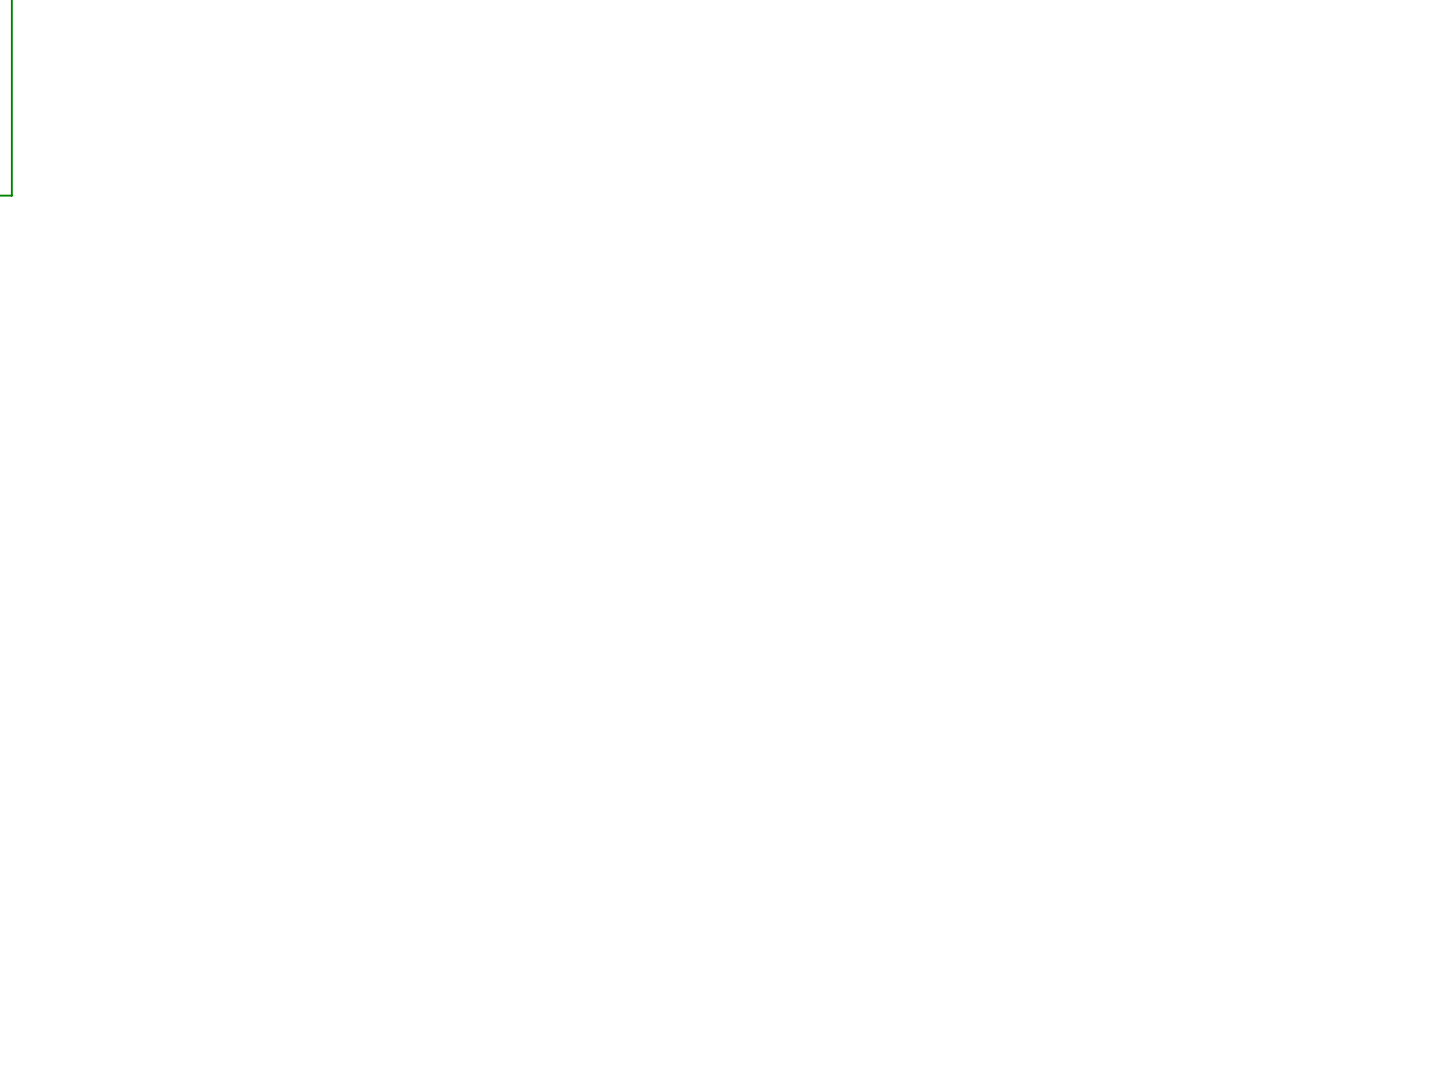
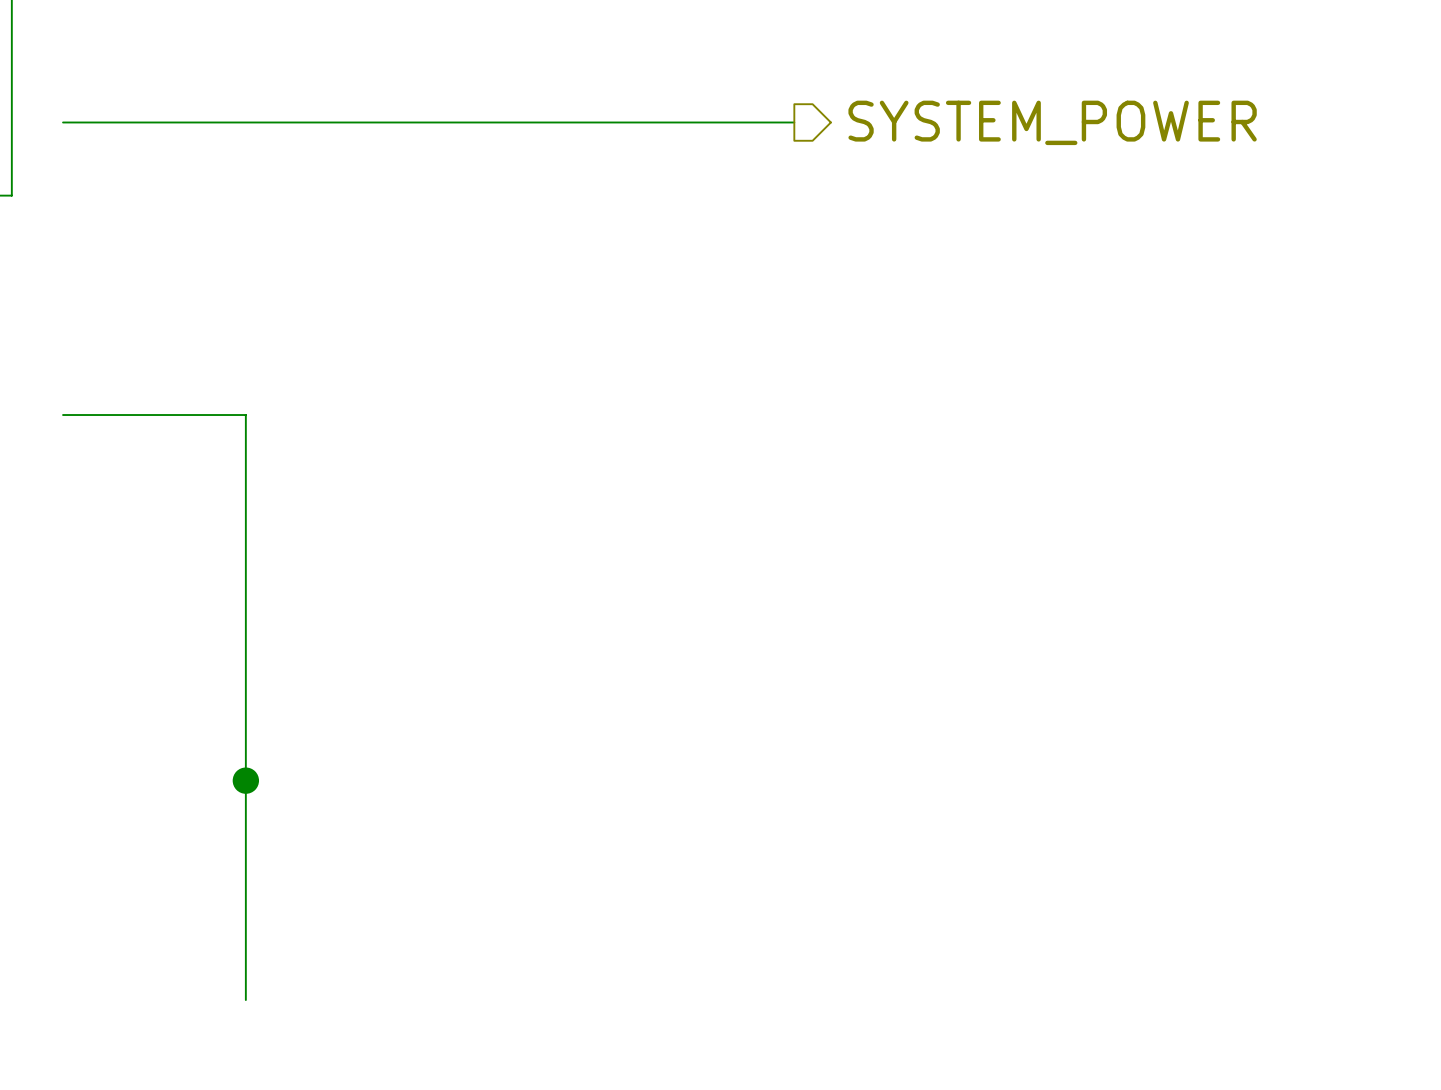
wire: none -> (63, 122) (794, 122)
hierarchical label: none -> SYSTEM_POWER (1052, 122)
wire: none -> (63, 415) (245, 415) (245, 1000)
junction: none -> (245, 780)

